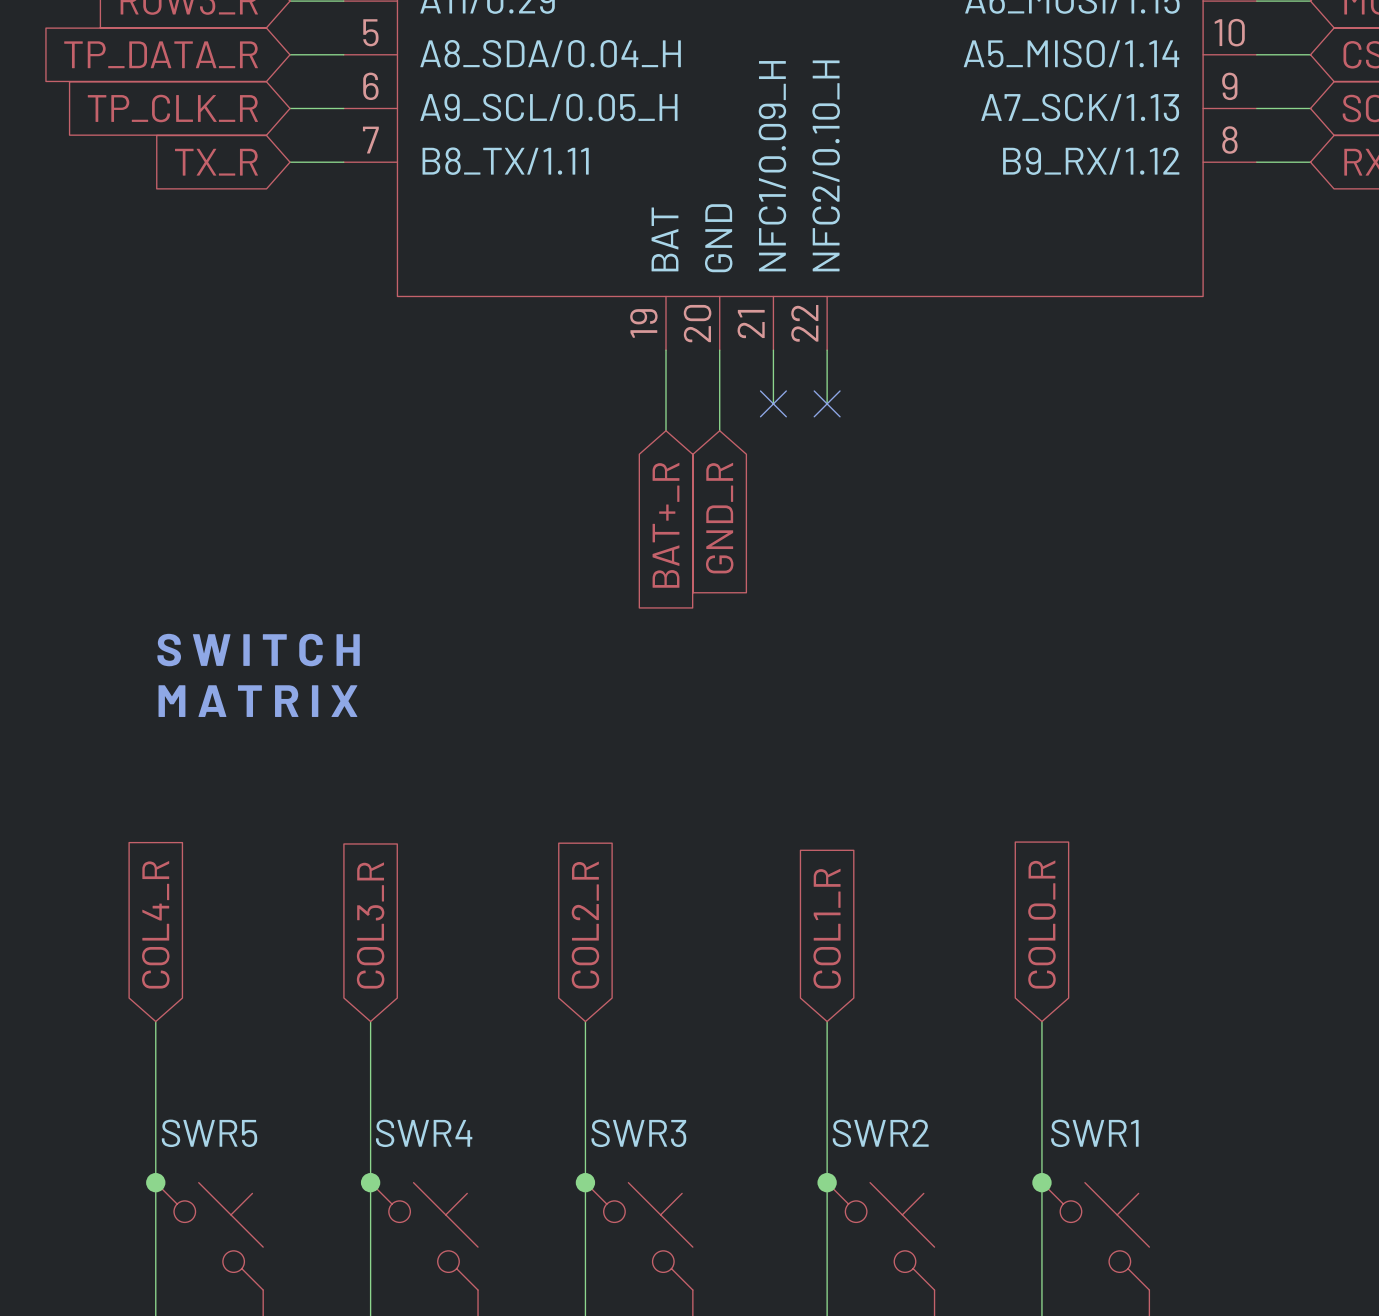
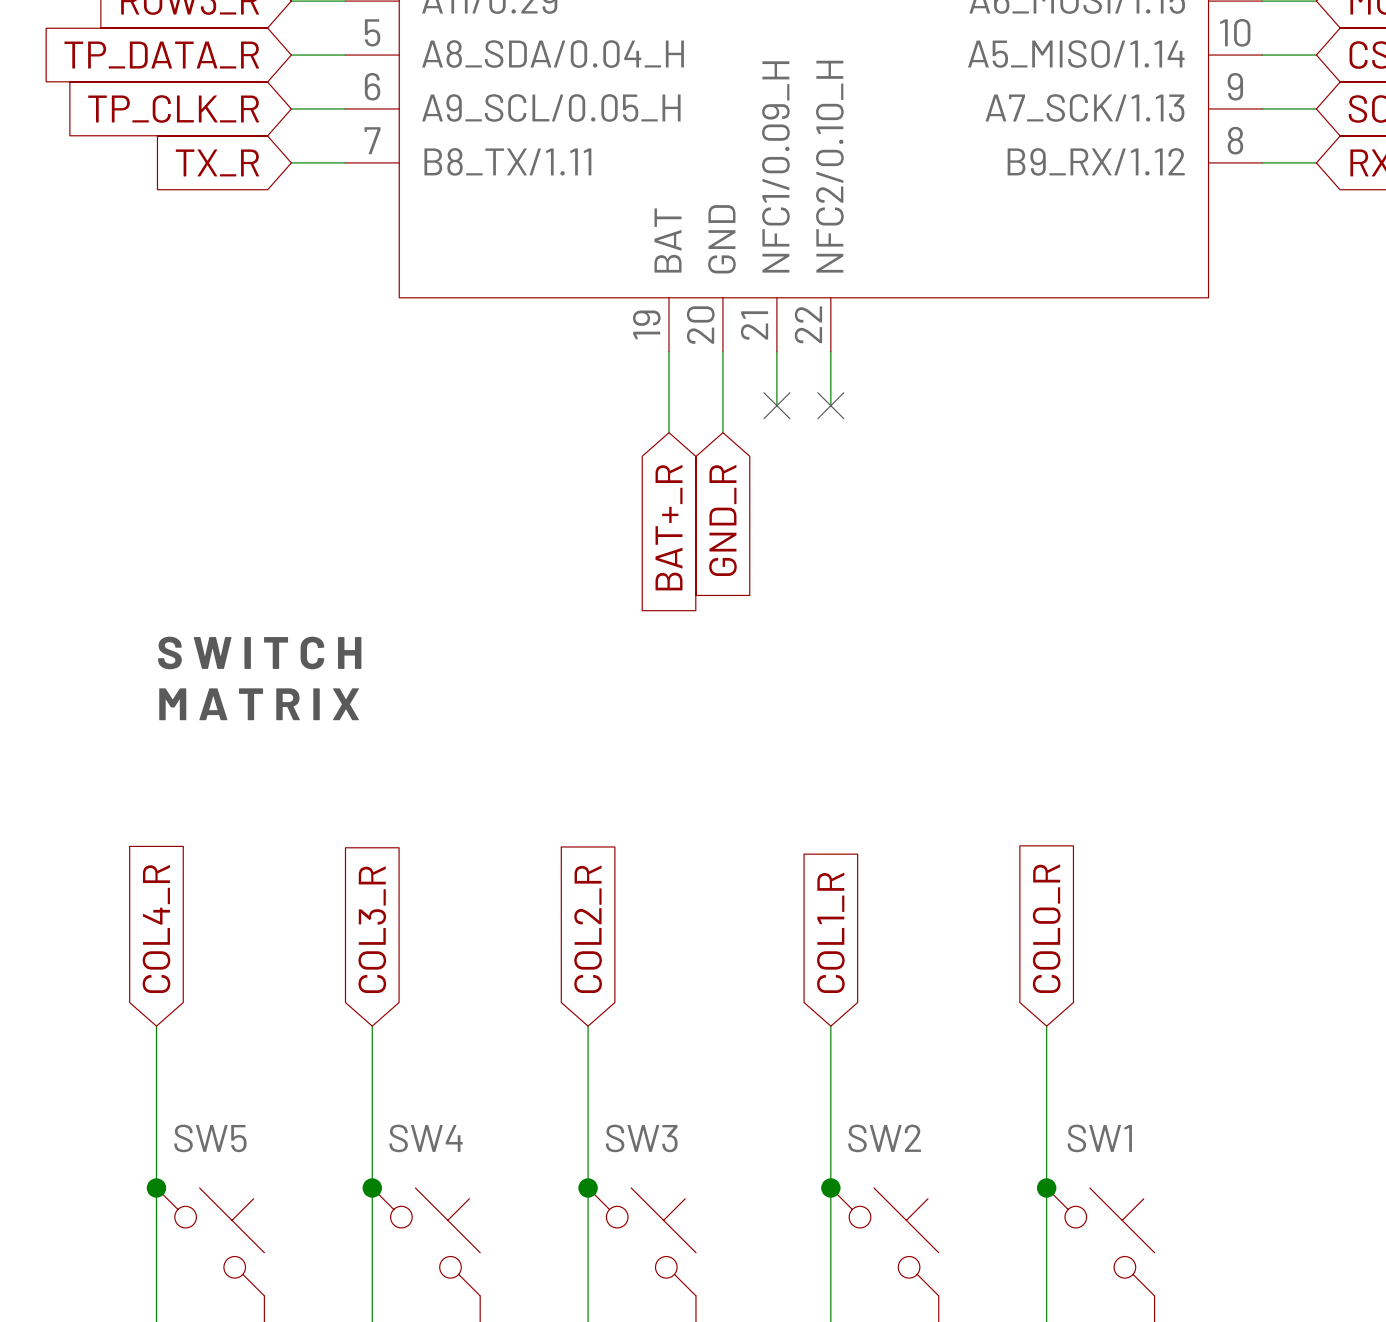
SWR5 name: SWR5 (209, 1133) -> SW5 (210, 1138)
SWR4 name: SWR4 (424, 1133) -> SW4 (426, 1138)
SWR3 name: SWR3 (638, 1133) -> SW3 (641, 1138)
SWR2 name: SWR2 (880, 1133) -> SW2 (884, 1138)
SWR1 name: SWR1 (1094, 1133) -> SW1 (1099, 1138)

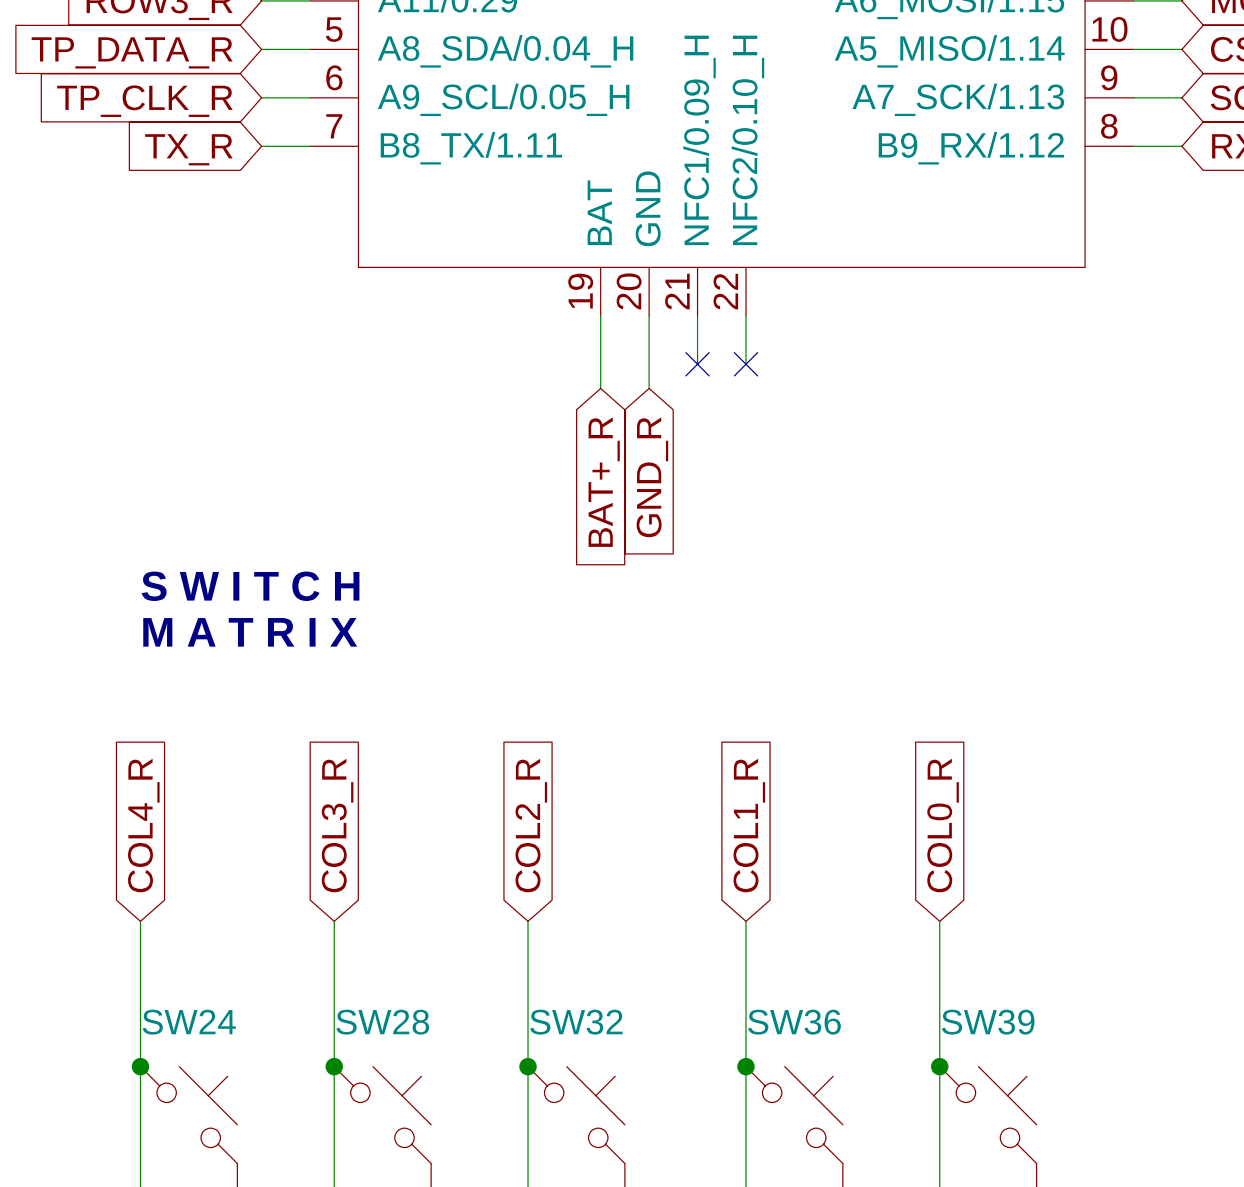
SW5 name: SW5 (210, 1138) -> SW24 (189, 1022)
SW4 name: SW4 (426, 1138) -> SW28 (382, 1022)
SW3 name: SW3 (641, 1138) -> SW32 (576, 1022)
SW2 name: SW2 (884, 1138) -> SW36 (794, 1022)
SW1 name: SW1 (1099, 1138) -> SW39 (988, 1022)

